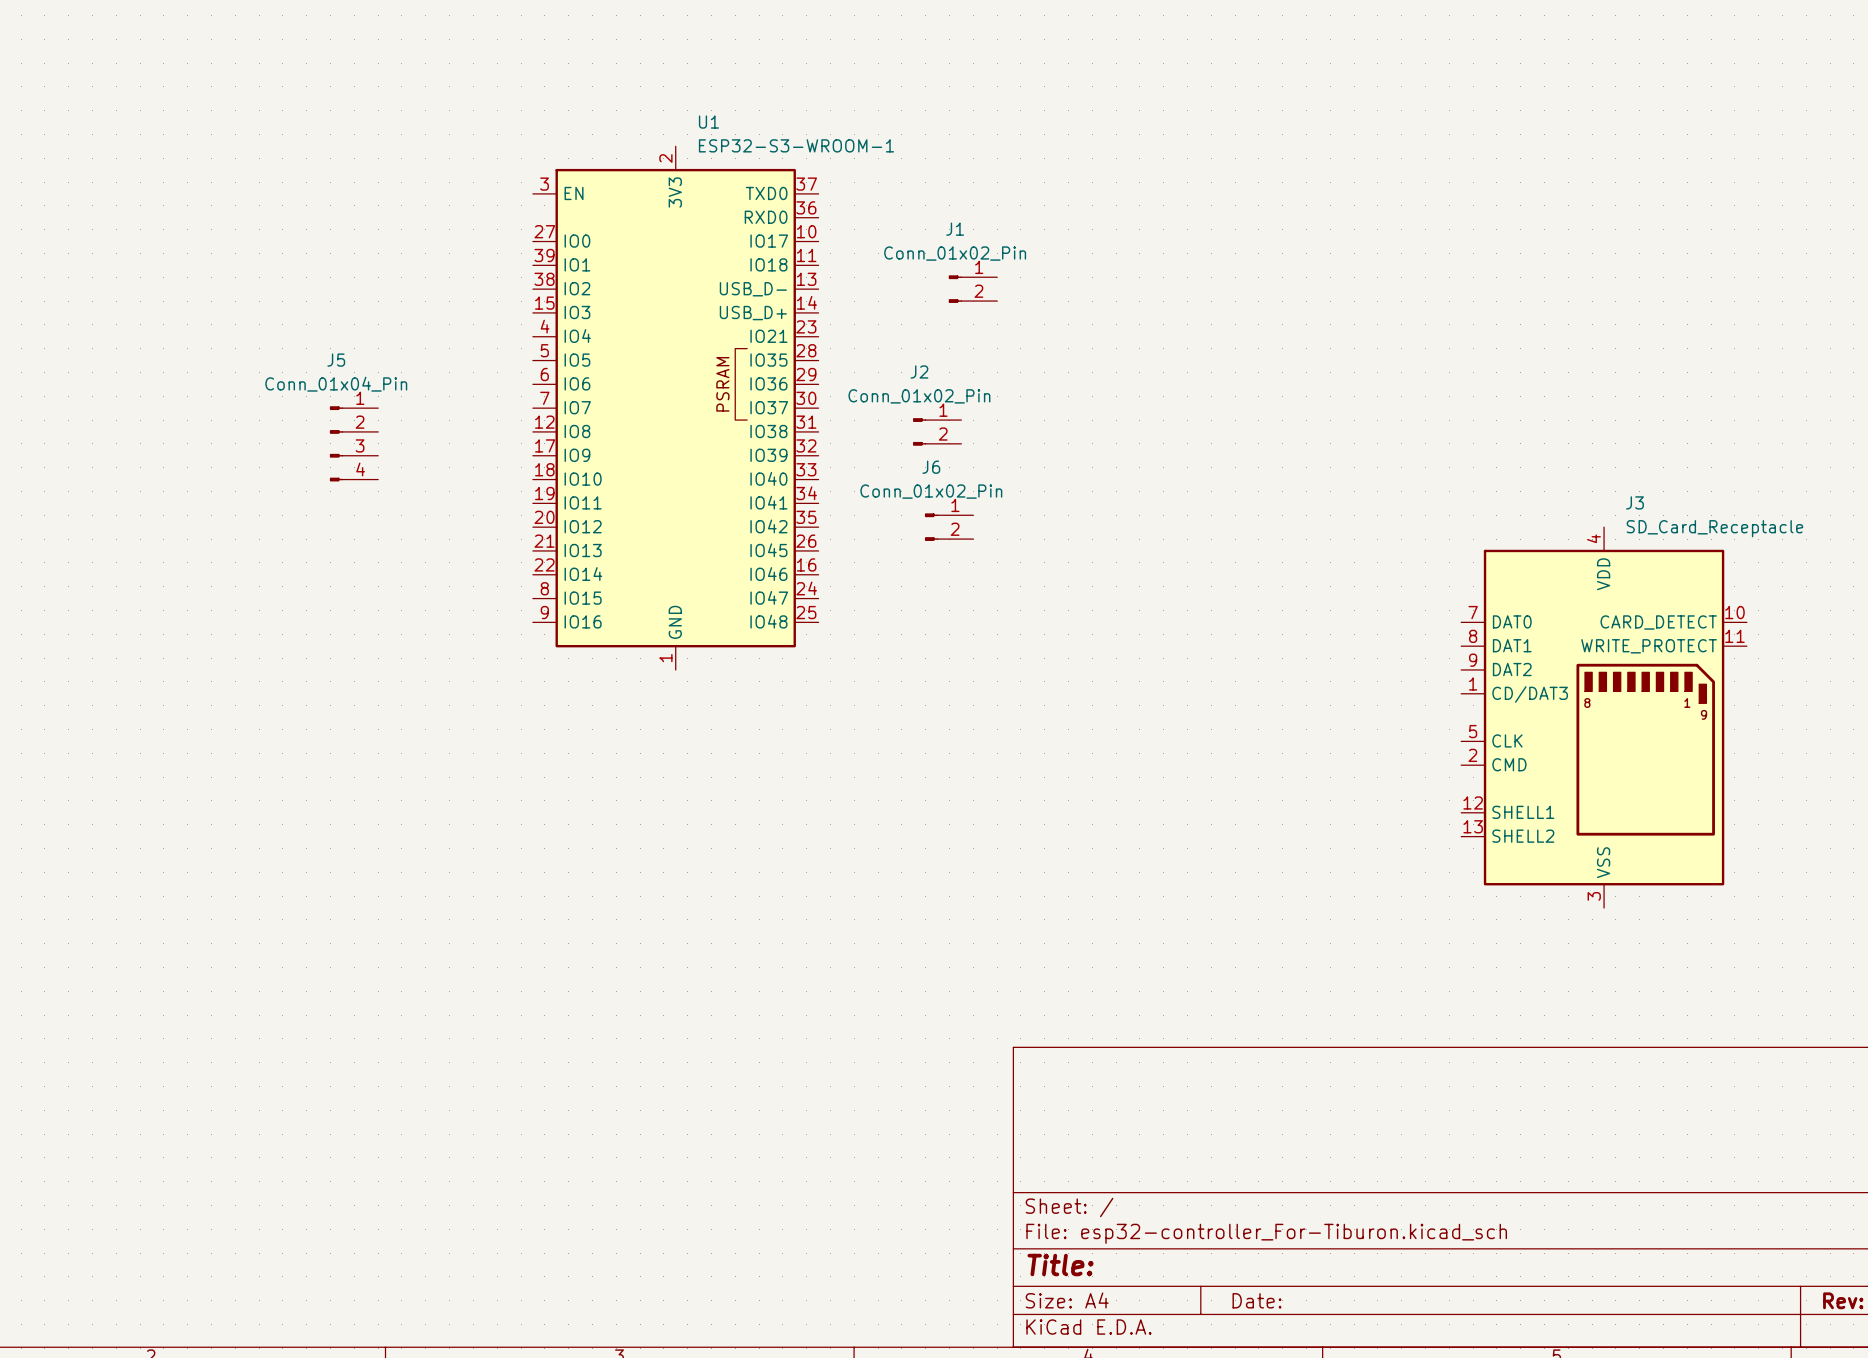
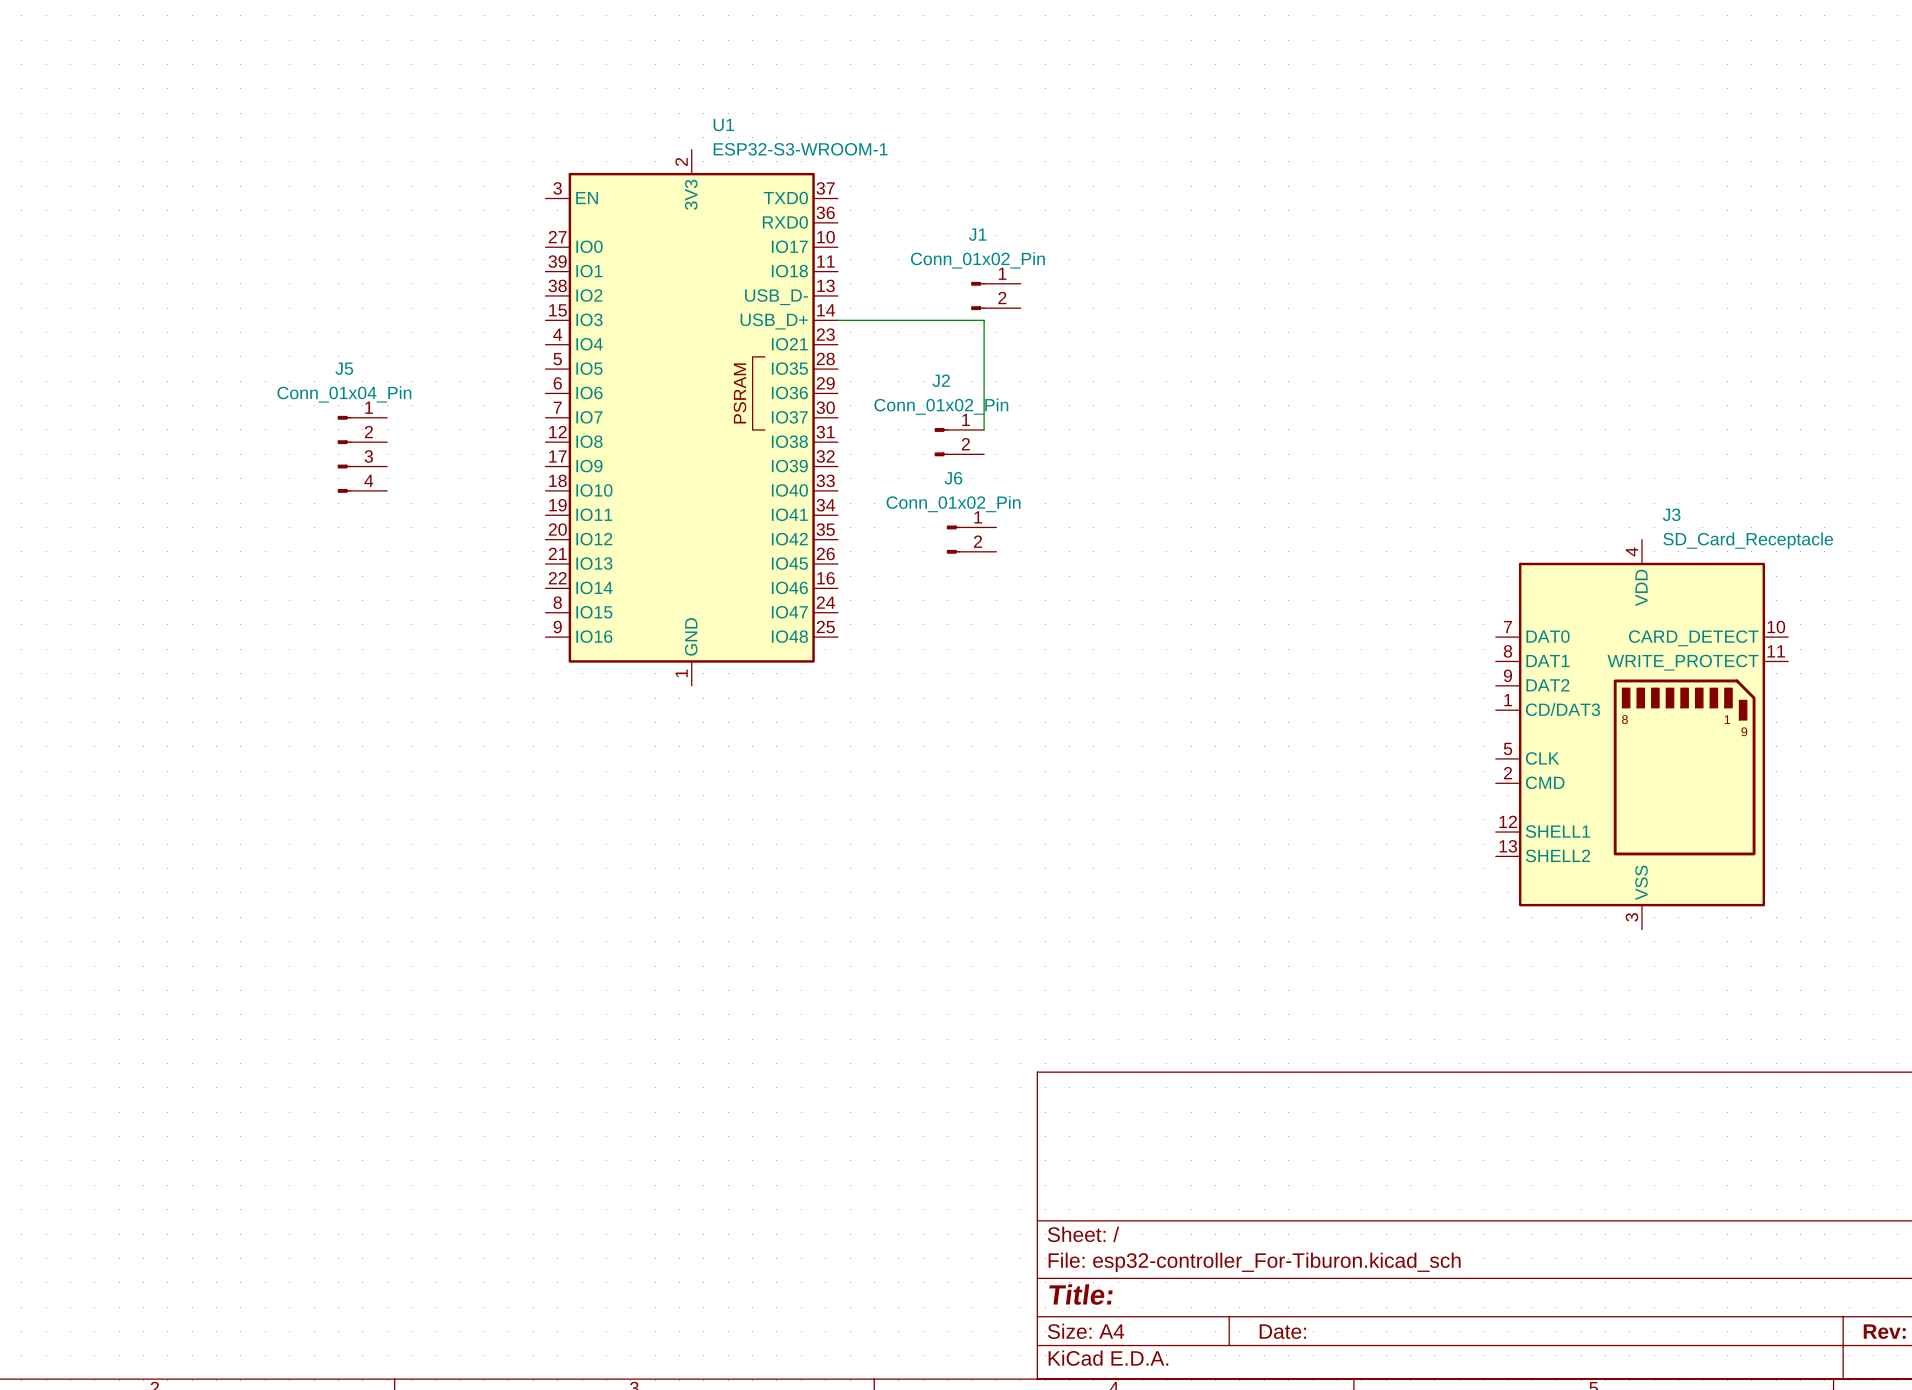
wire: none -> (837, 320) (984, 320) (984, 429)

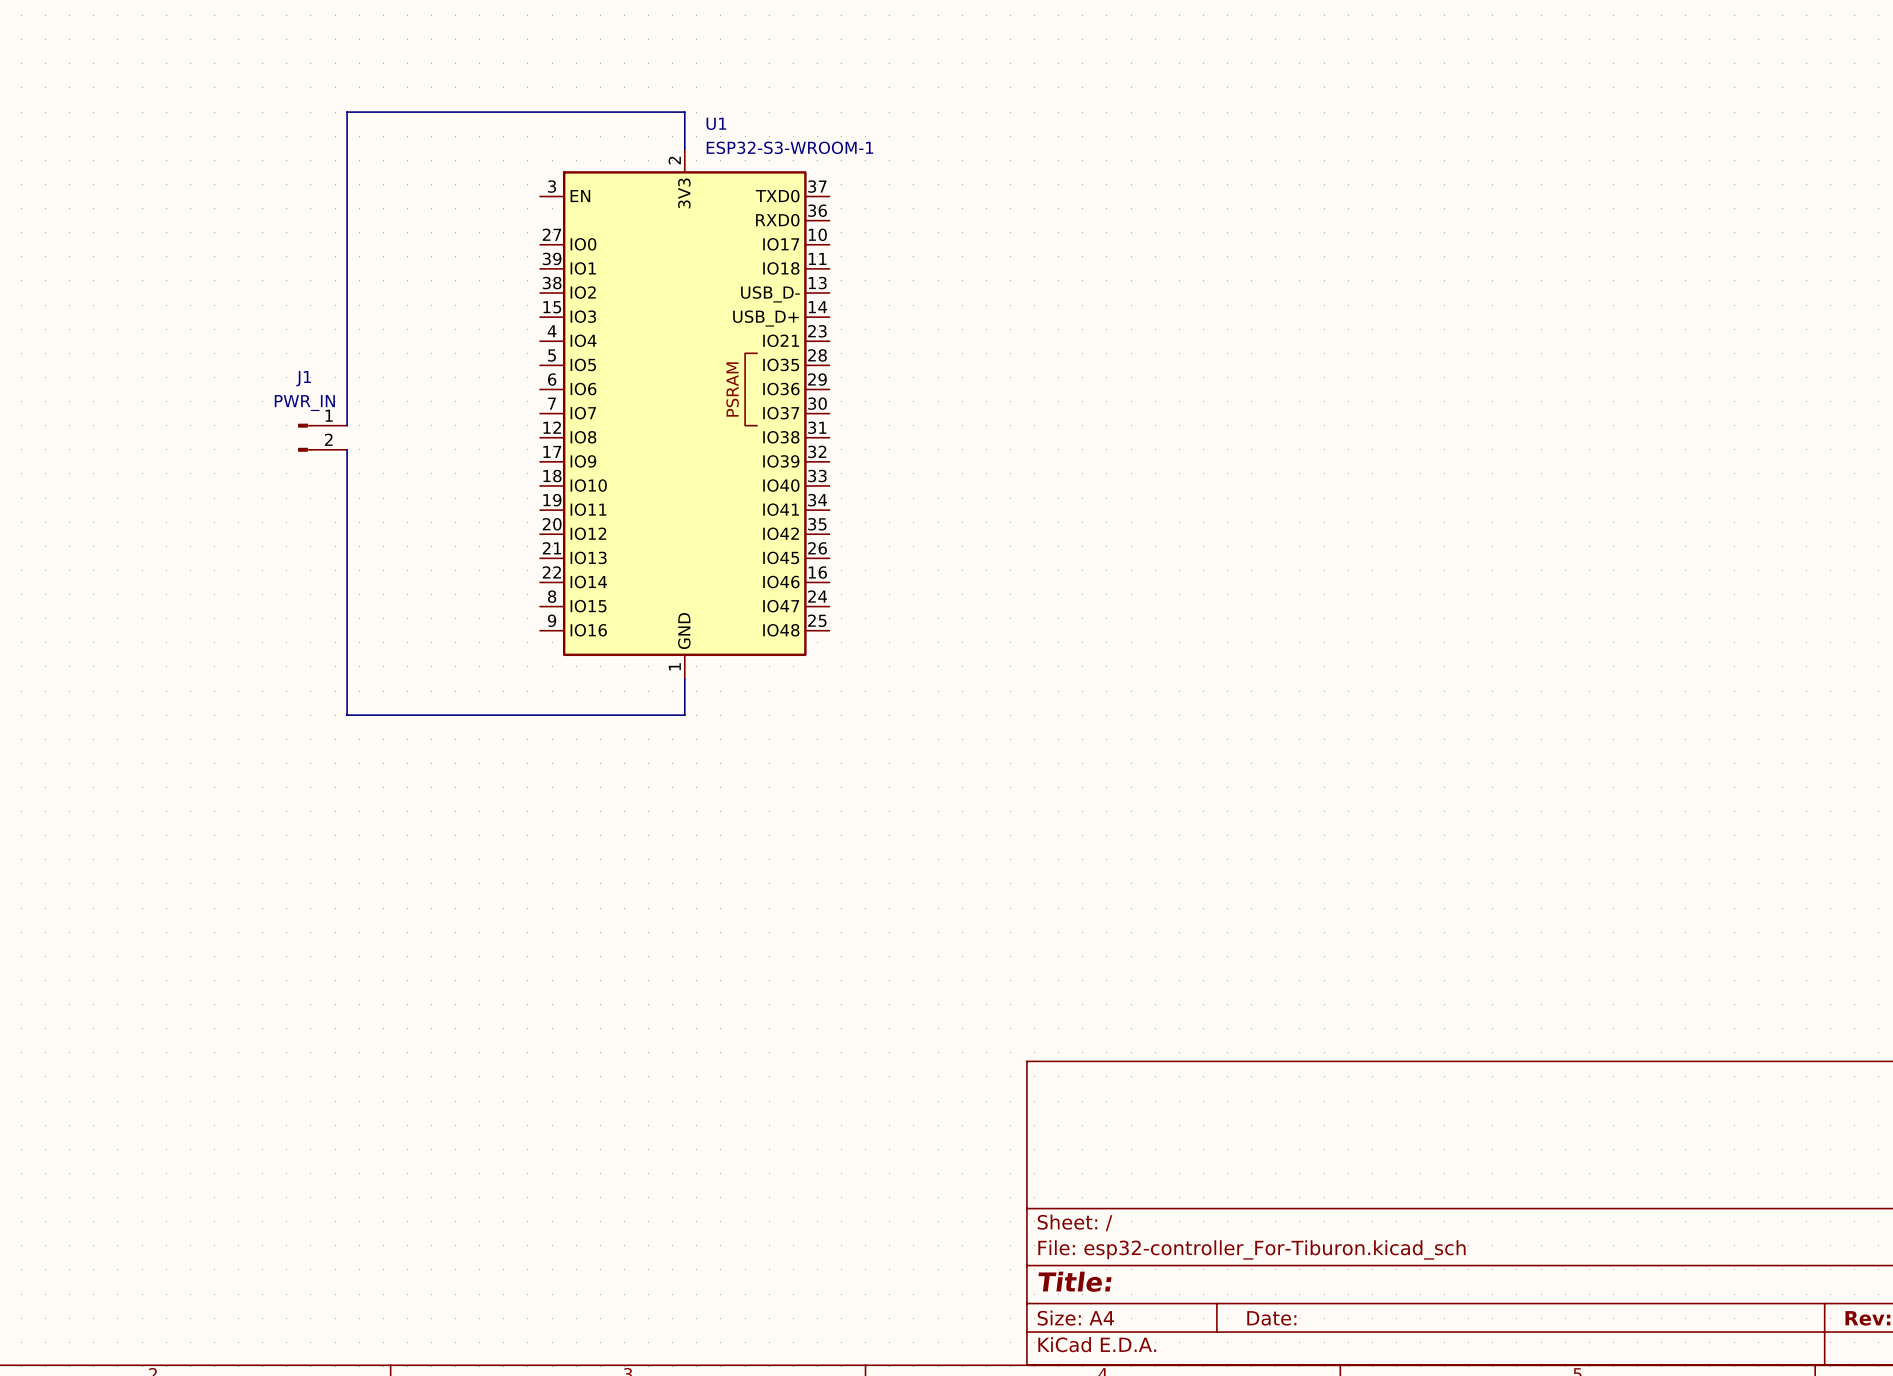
wire: none -> (684, 148) (684, 112) (347, 112) (347, 425)
J1 value: Conn_01x02_Pin (977, 260) -> PWR_IN (304, 403)
J1 position: (995, 295) -> (322, 437)
wire: (837, 320) (984, 320) (984, 429) -> none
J2: Conn_01x02_Pin (959, 442) -> none
wire: none -> (347, 449) (347, 715) (684, 715) (684, 678)
J5: Conn_01x04_Pin (362, 454) -> none
J6: Conn_01x02_Pin (971, 539) -> none
J3: SD_Card_Receptacle (1641, 734) -> none

